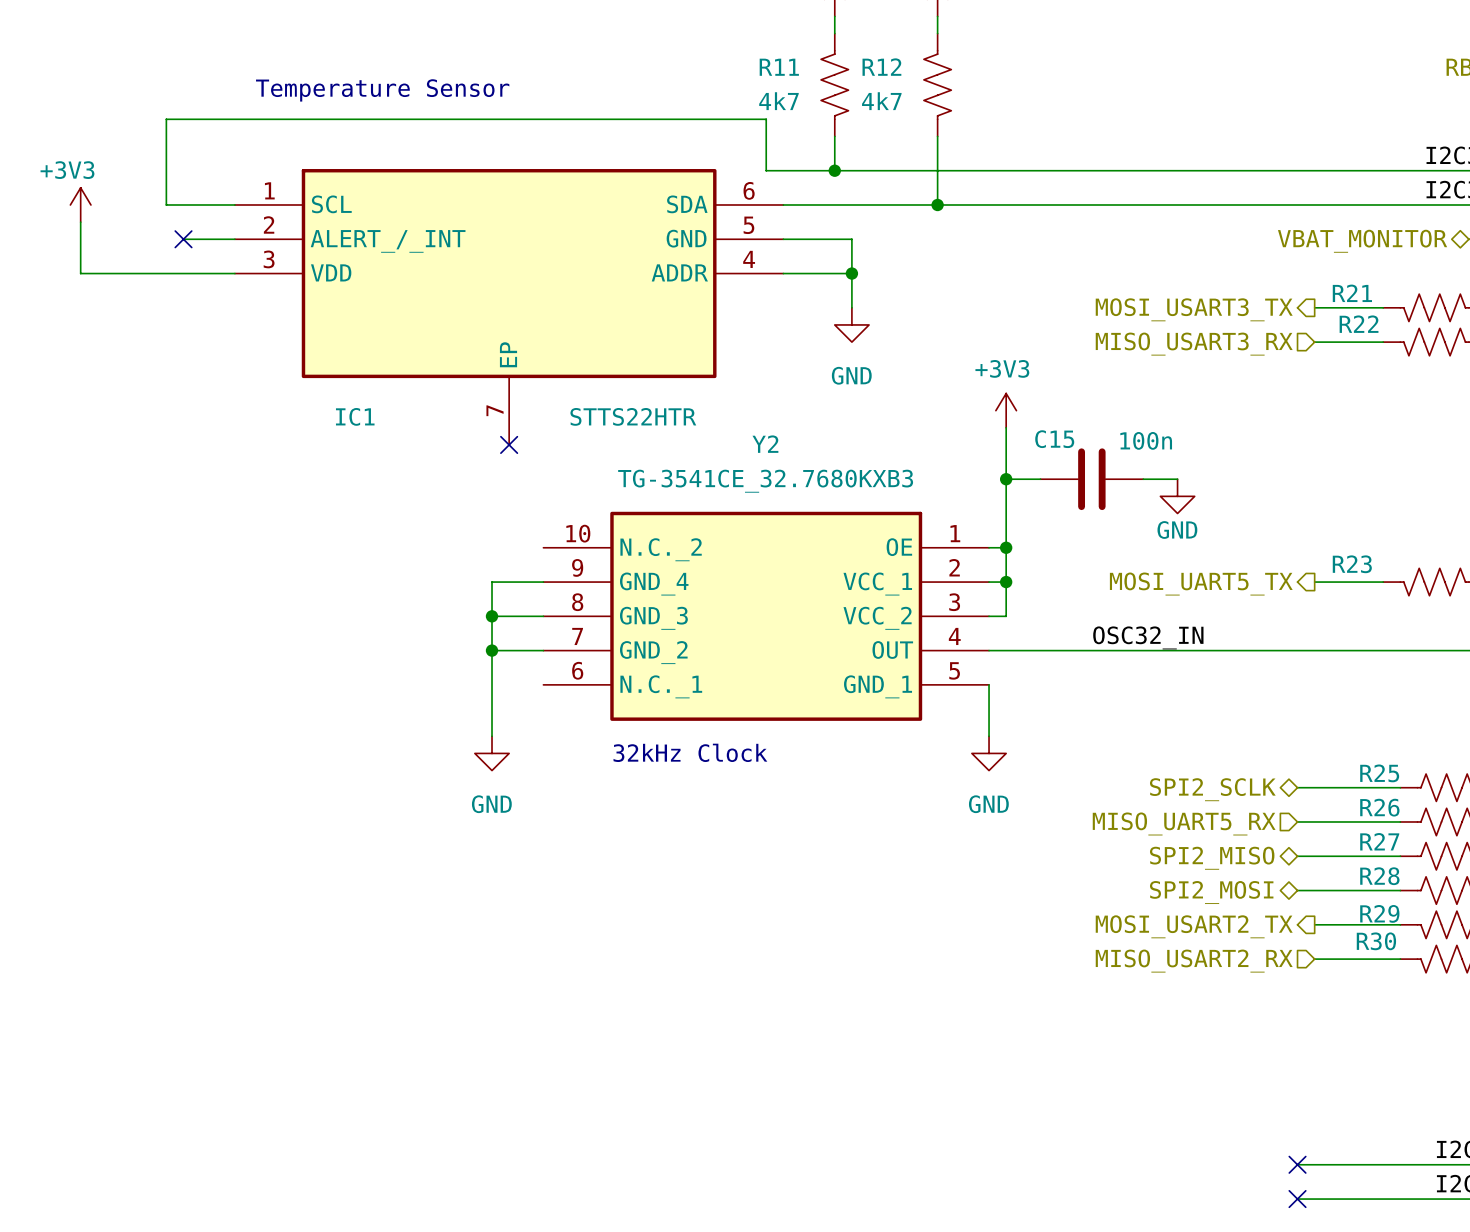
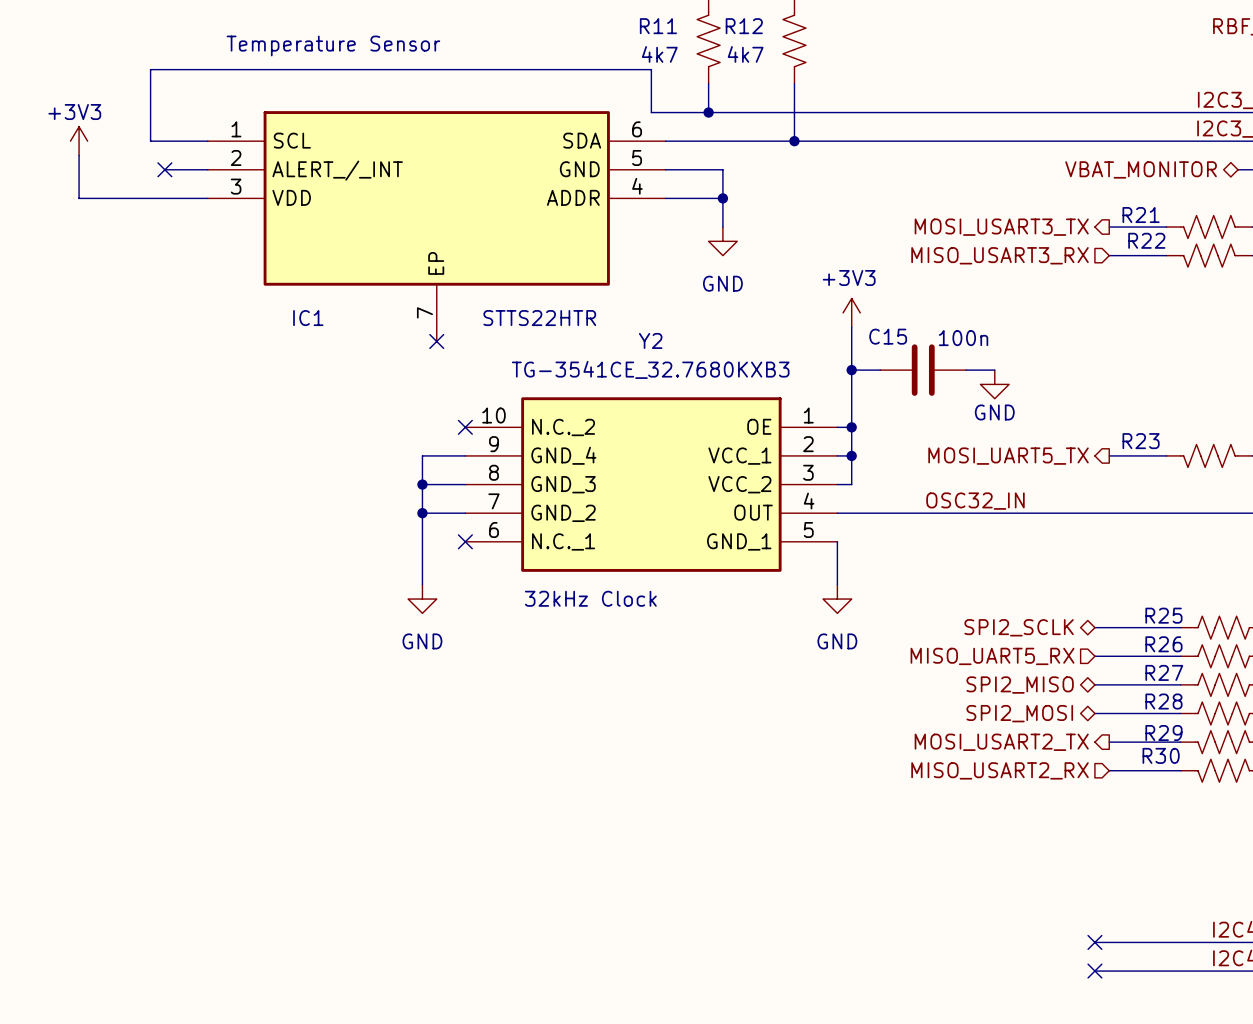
no-connect mark: none -> (465, 427)
no-connect mark: none -> (465, 541)

